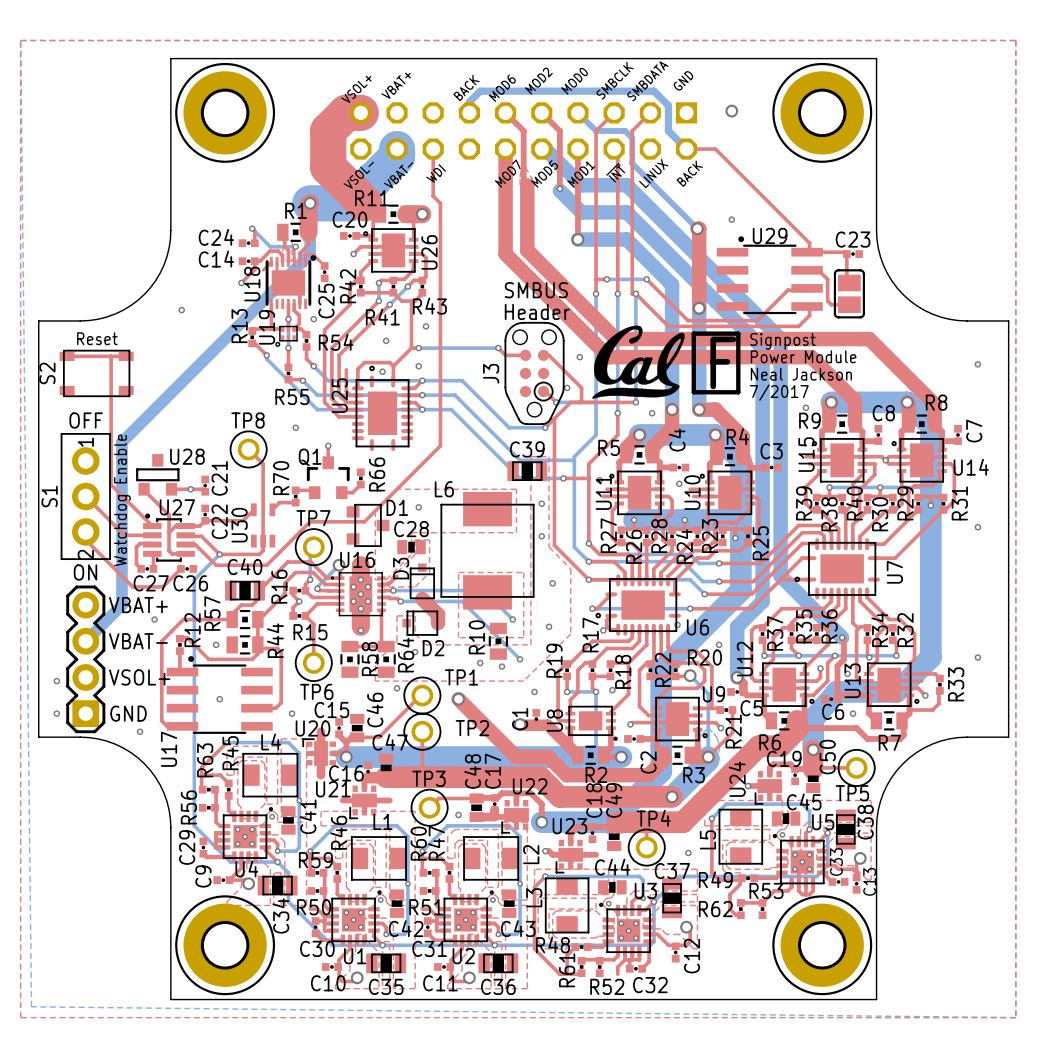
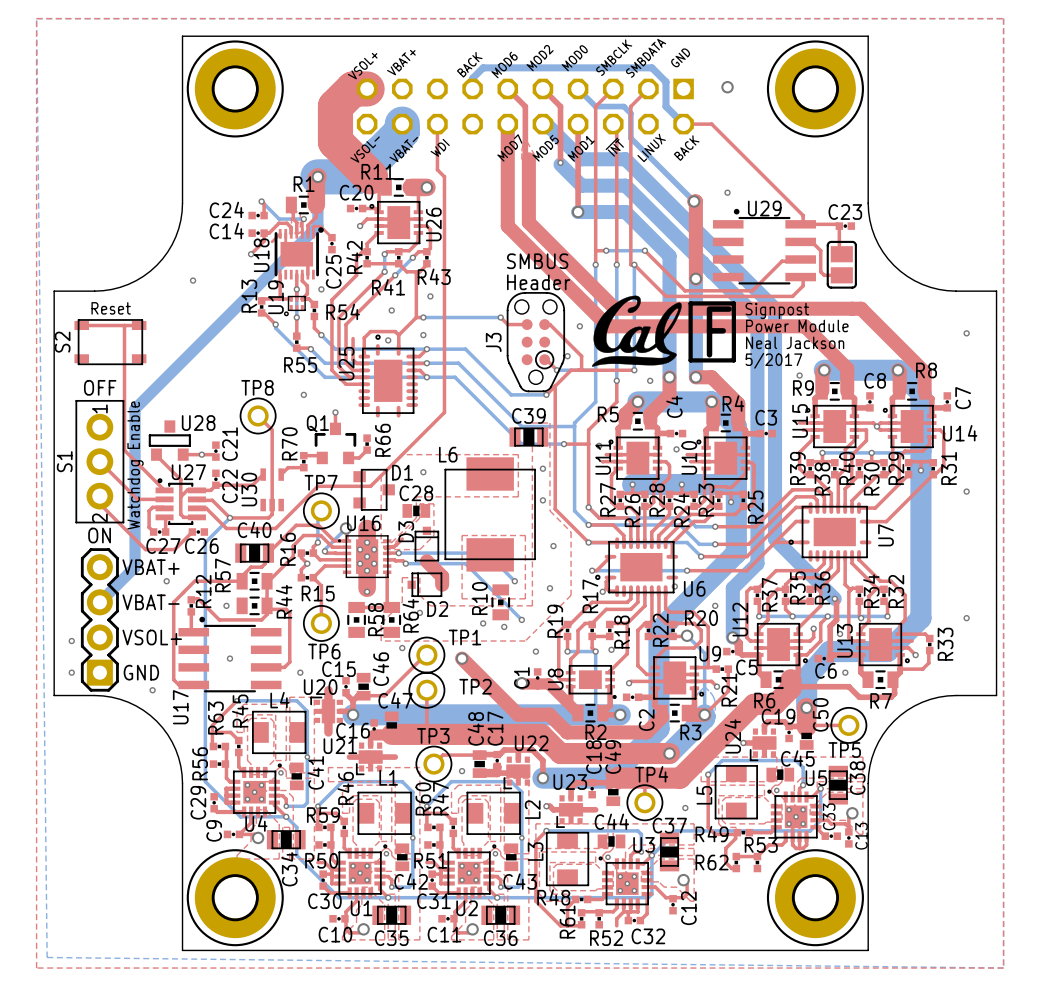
text: 7/2017 (779, 392) -> 5/2017 (773, 360)

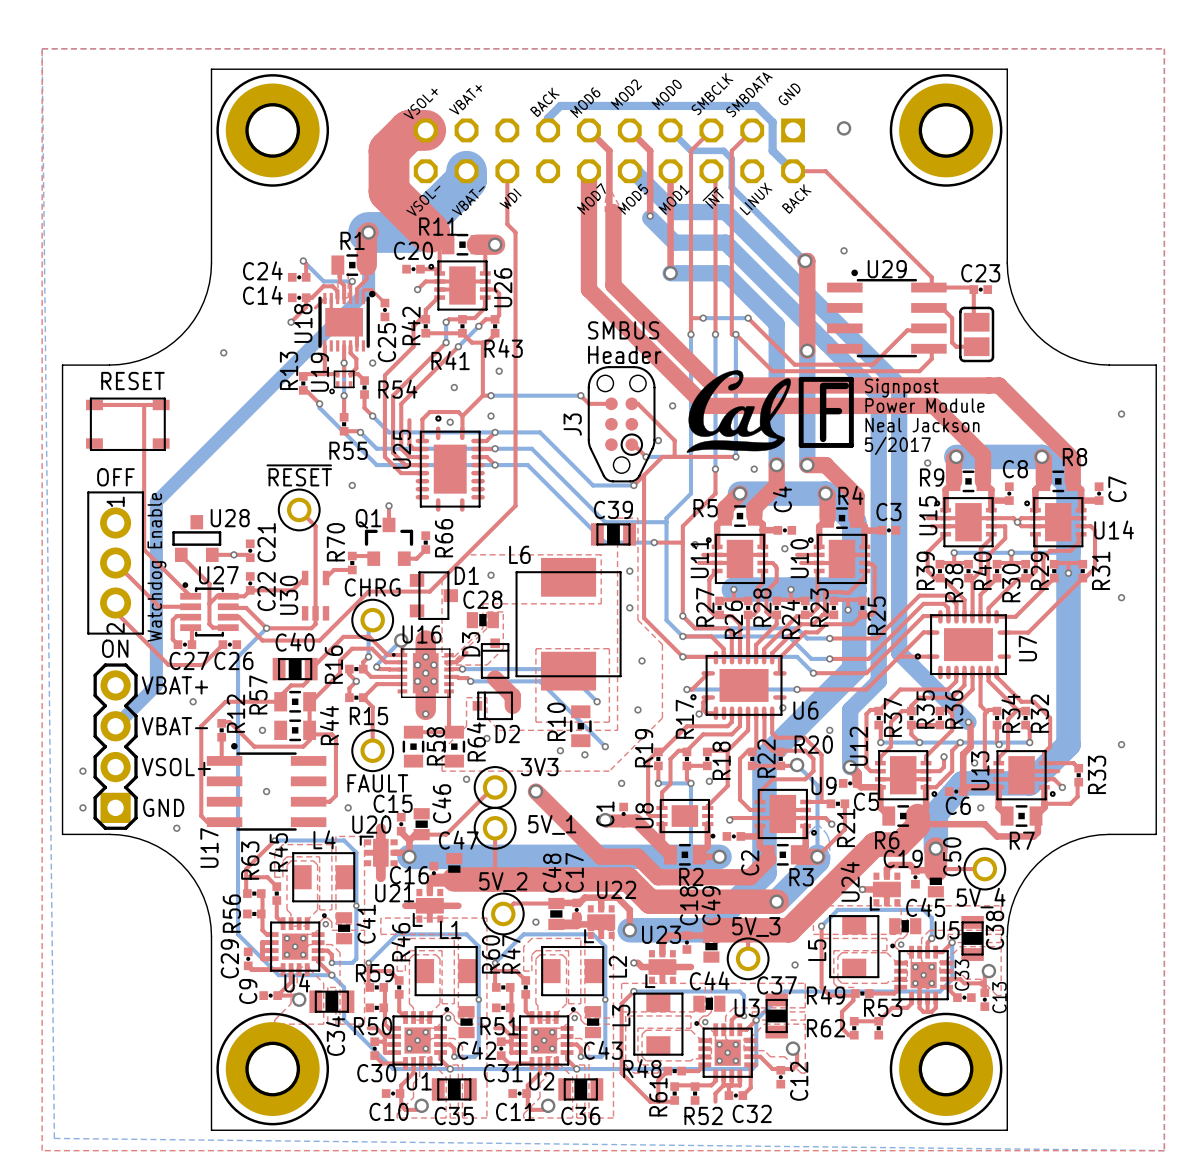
text: Reset (111, 308) -> none
S2 name: S2 (62, 342) -> RESET (132, 381)
TP8 name: TP8 (257, 387) -> ~{RESET} (299, 475)
S1 name: S1 (64, 461) -> none
TP7 name: TP7 (321, 482) -> CHRG (372, 587)
TP1 name: TP1 (464, 637) -> 3V3 (539, 767)
TP6 name: TP6 (324, 651) -> FAULT (377, 783)
TP2 name: TP2 (475, 686) -> 5V_1 (552, 824)
TP3 name: TP3 (433, 735) -> 5V_2 (503, 882)
TP5 name: TP5 (844, 750) -> 5V_4 (981, 898)
TP4 name: TP4 (651, 774) -> 5V_3 (756, 926)

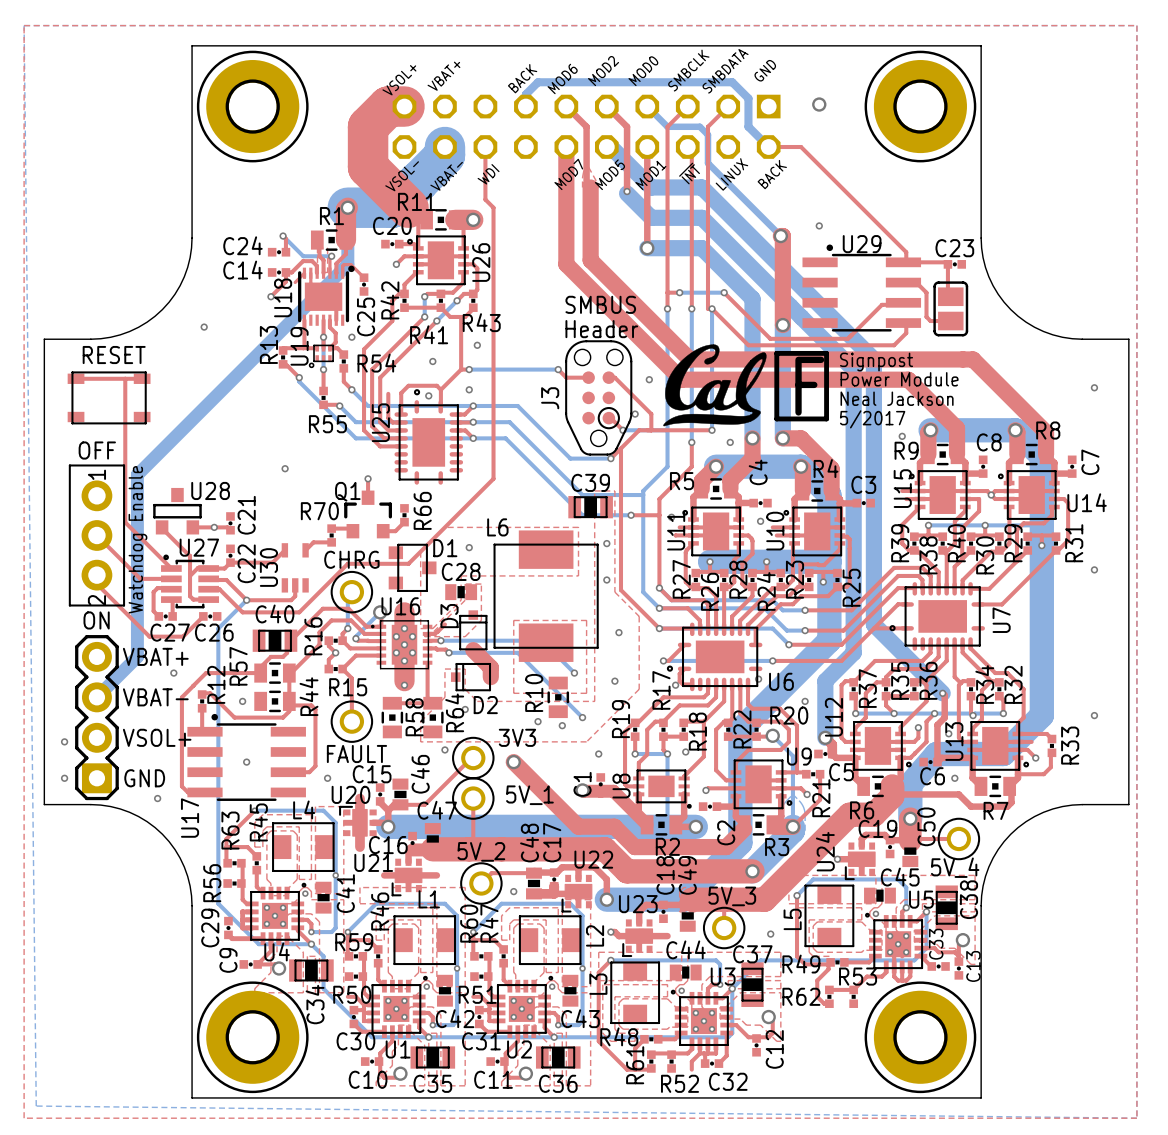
via position: (352, 485) -> (285, 468)
top track: (299, 509) (315, 526) (315, 613) -> none
~{RESET}: (299, 509) -> none
R70 name rotation: 0° (335, 542) -> 90° clockwise (319, 511)

